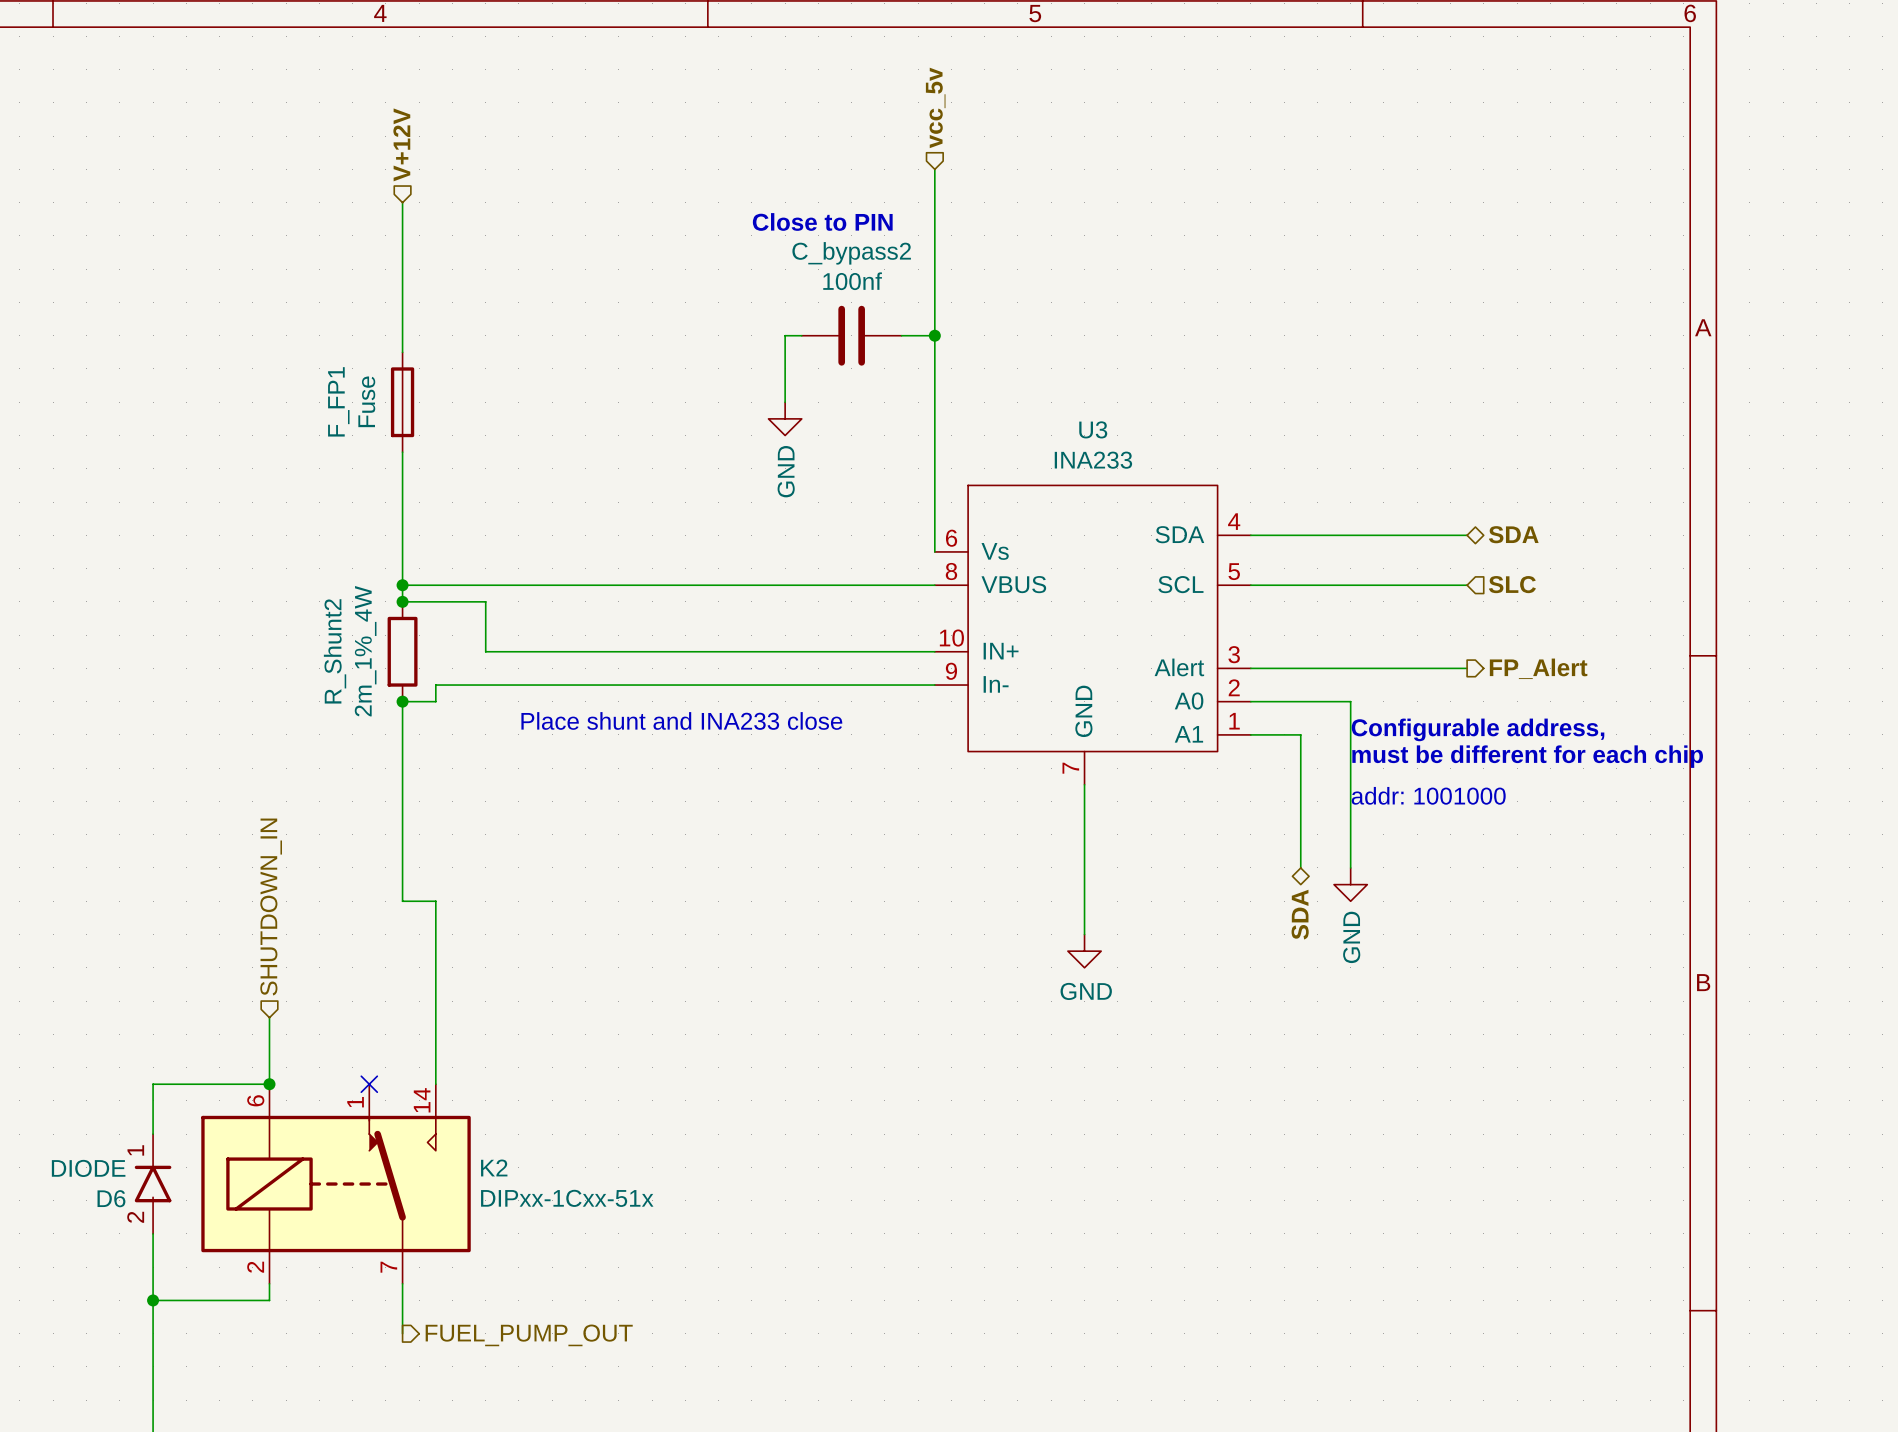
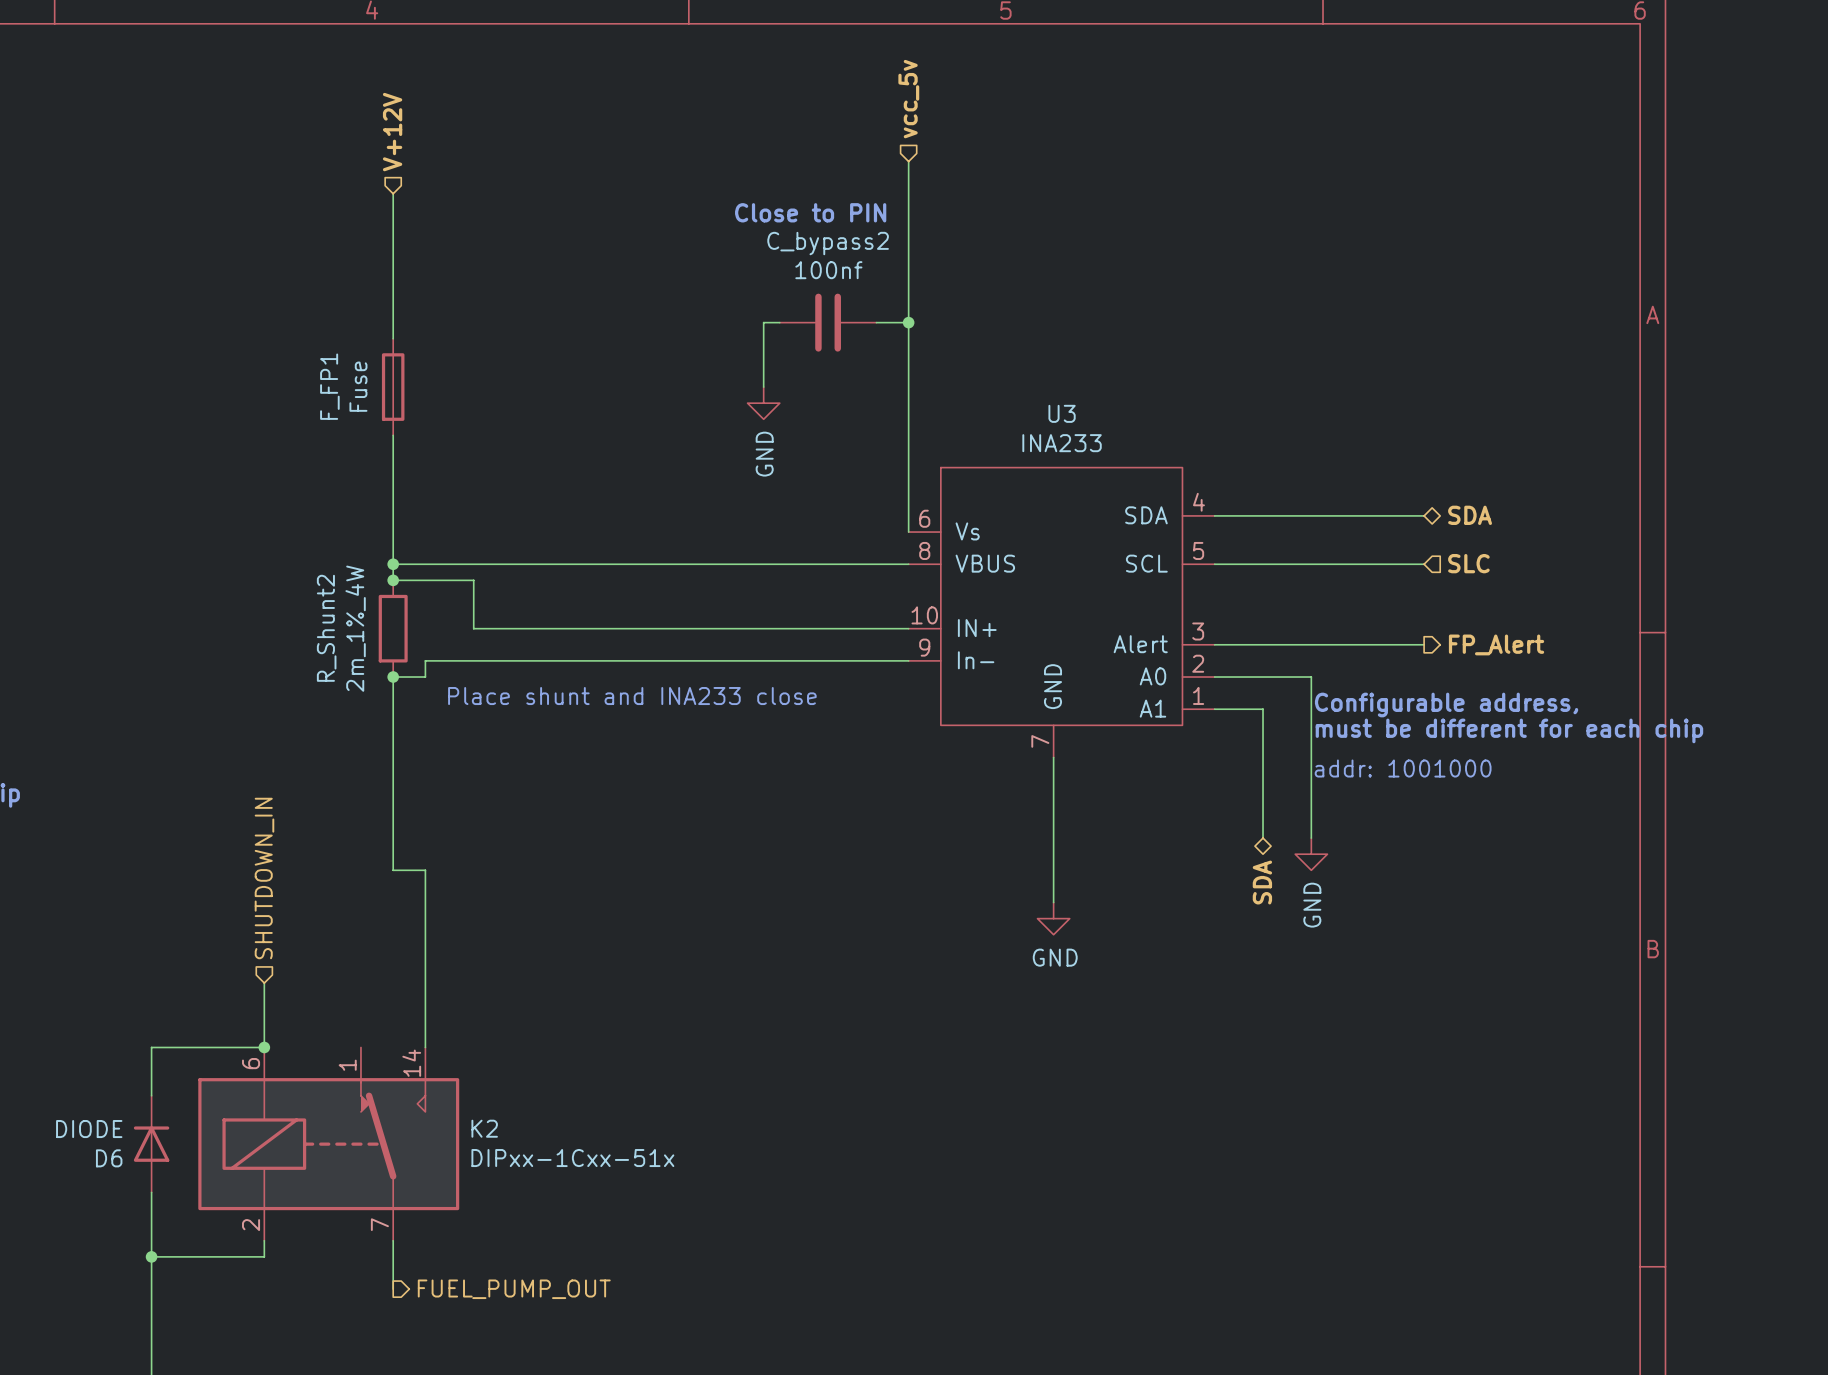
no-connect mark: (369, 1084) -> none
D6 symbol: [134, 1134, 172, 1234] -> [133, 1095, 170, 1193]

